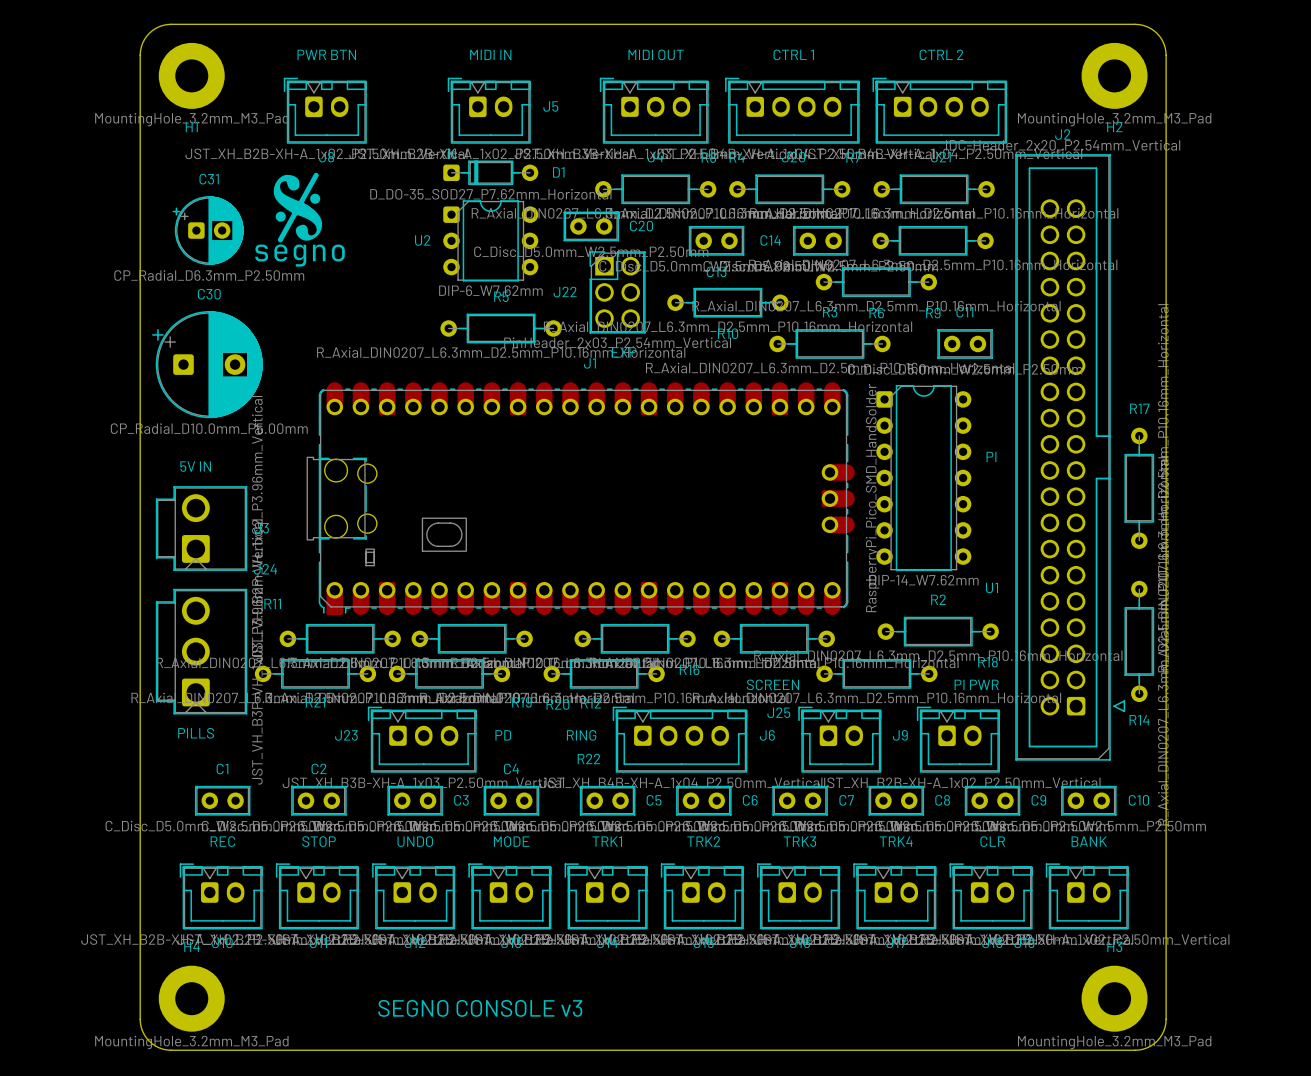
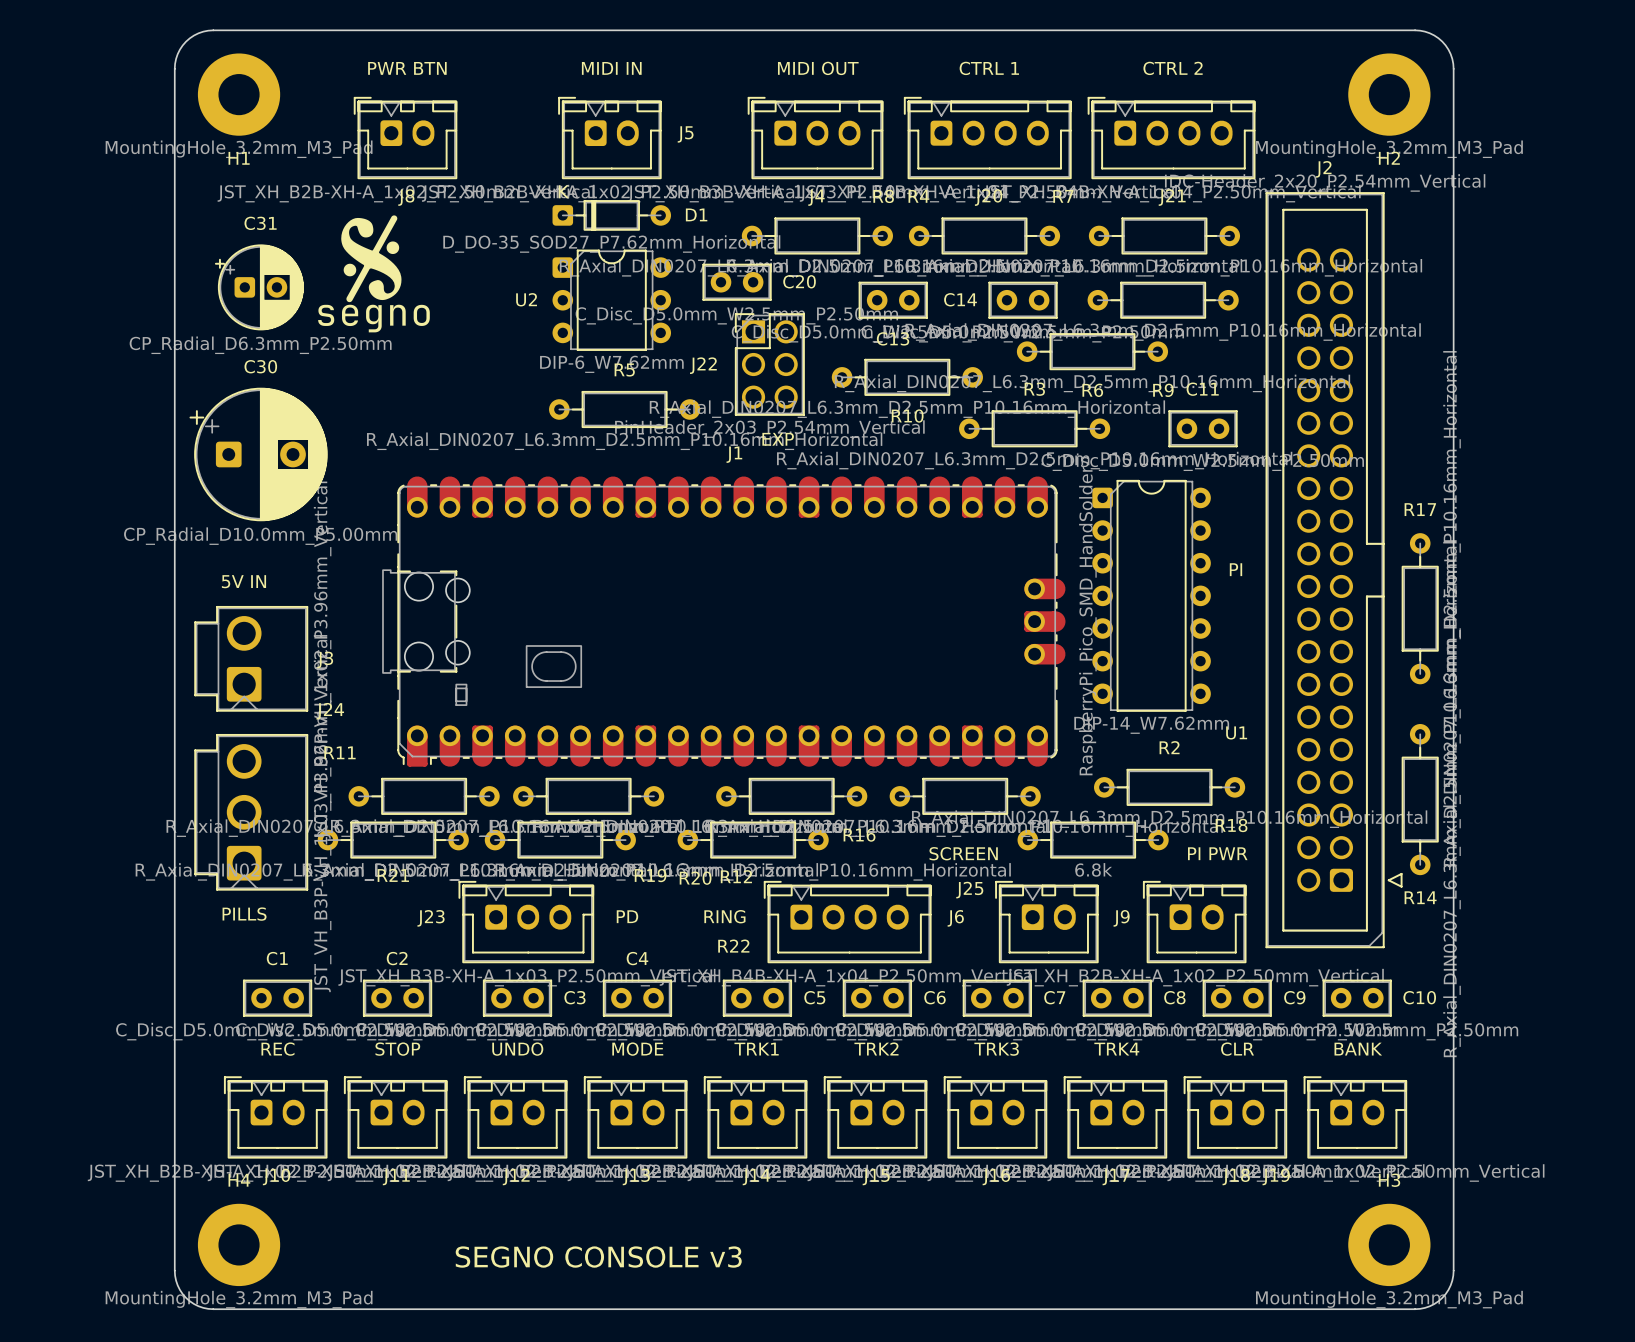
R18 value: R_Axial_DIN0207_L6.3mm_D2.5mm_P10.16mm_Horizontal (877, 697) -> 6.8k (1093, 869)

